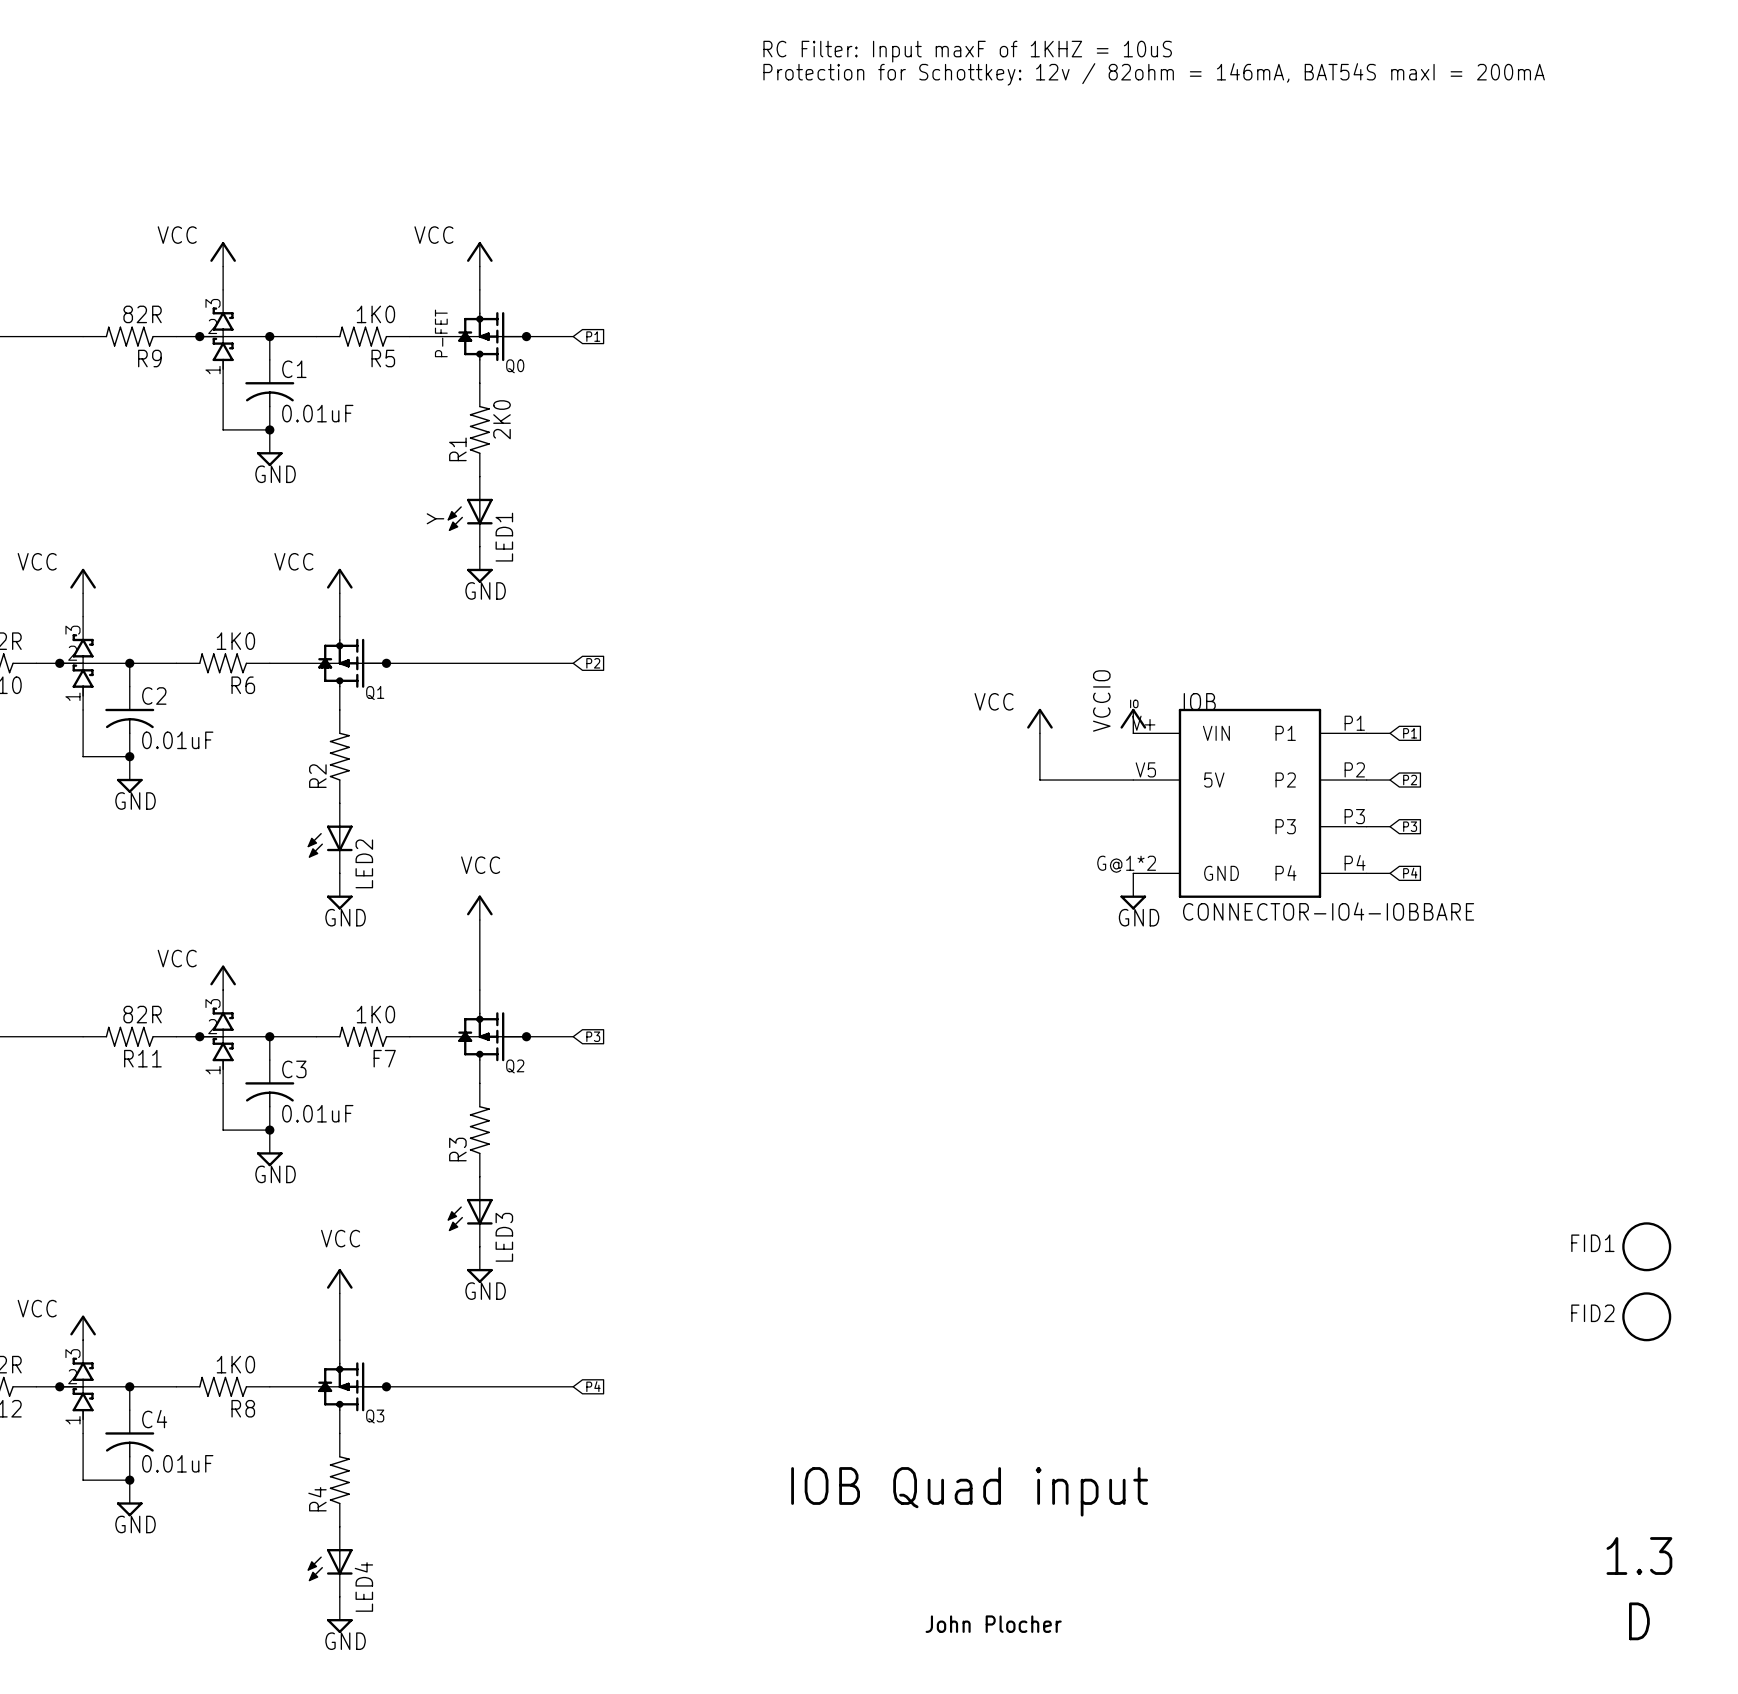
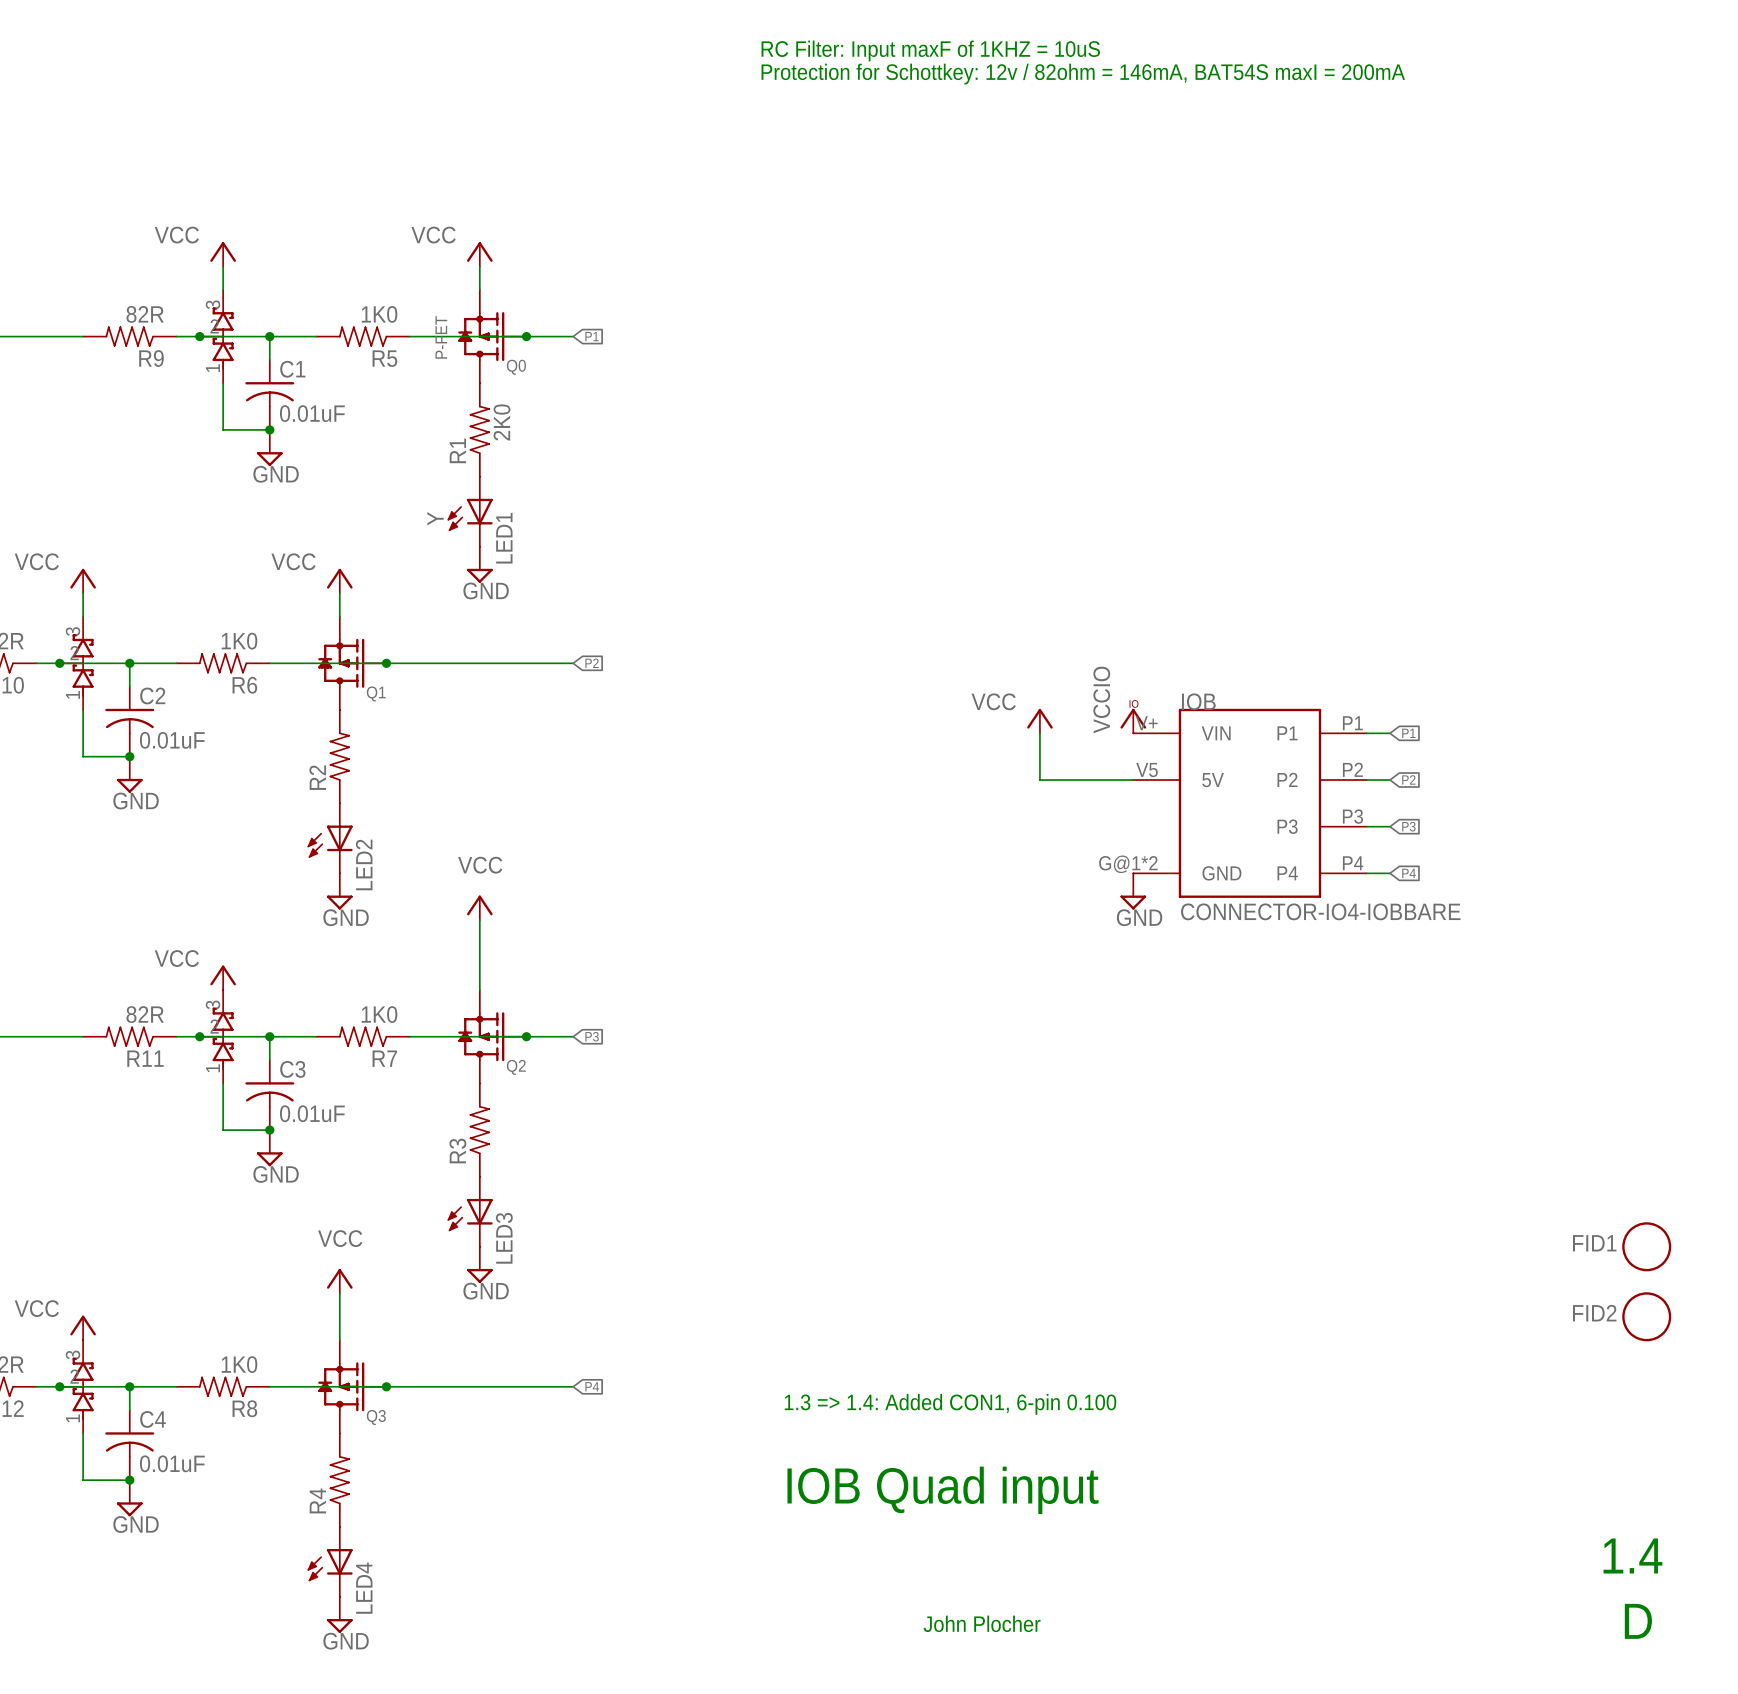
F7 name: F7 (384, 1058) -> R7 (384, 1058)
text: none -> 1.3 => 1.4: Added CON1, 6-pin 0.100 (950, 1404)
text: 1.3 (1639, 1556) -> 1.4 (1632, 1556)

